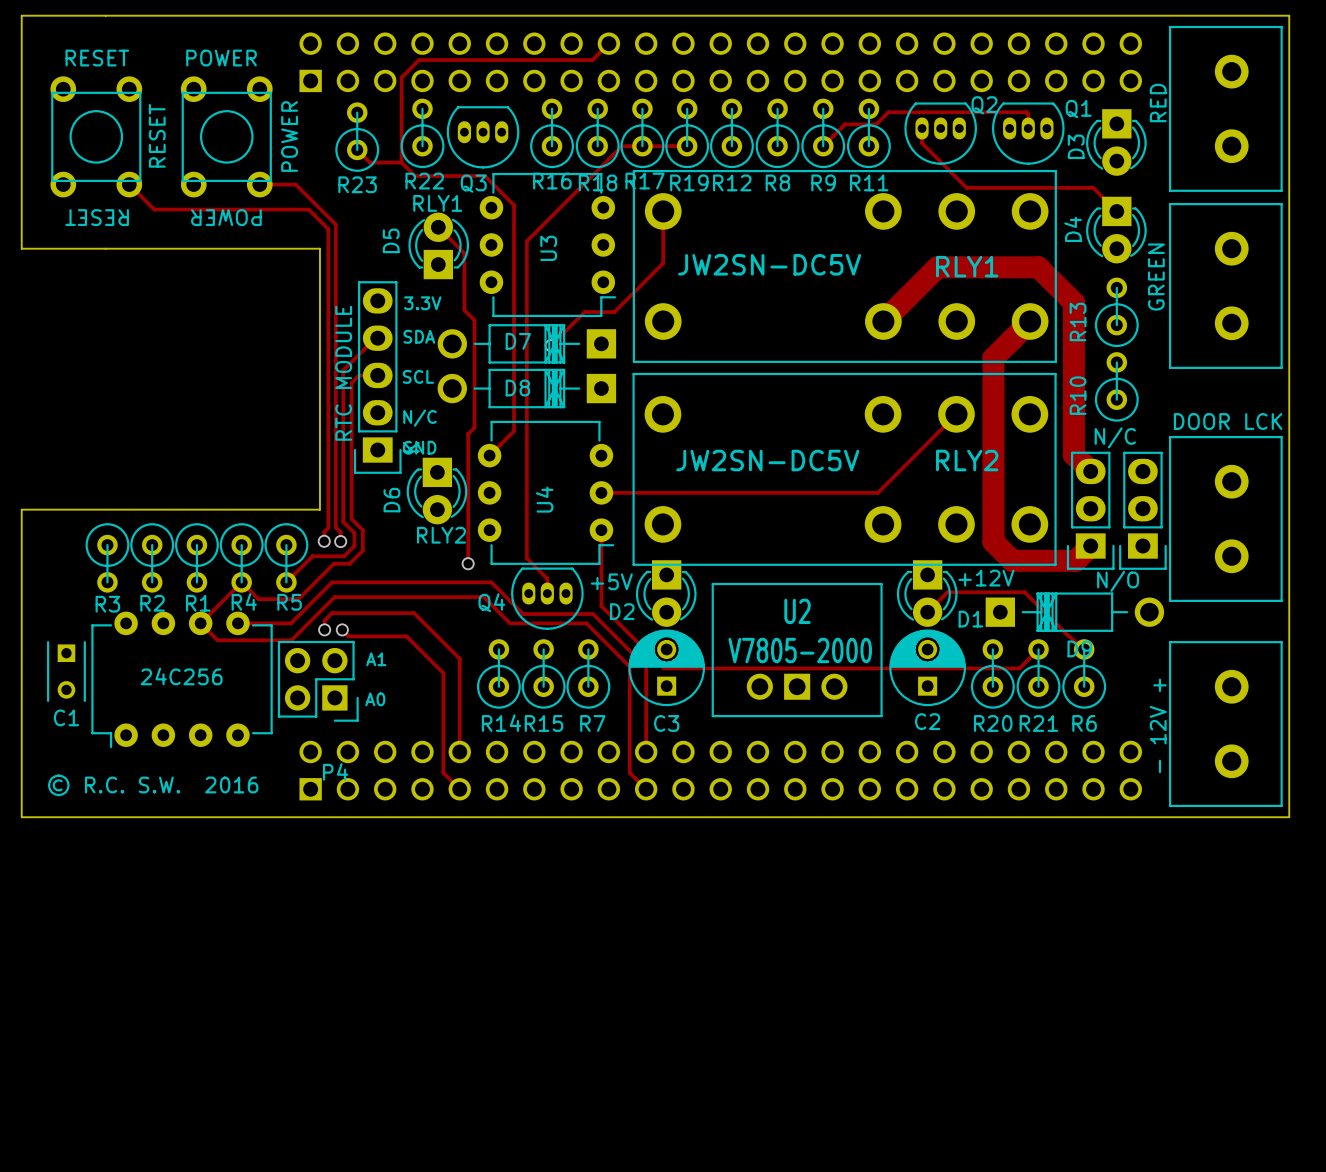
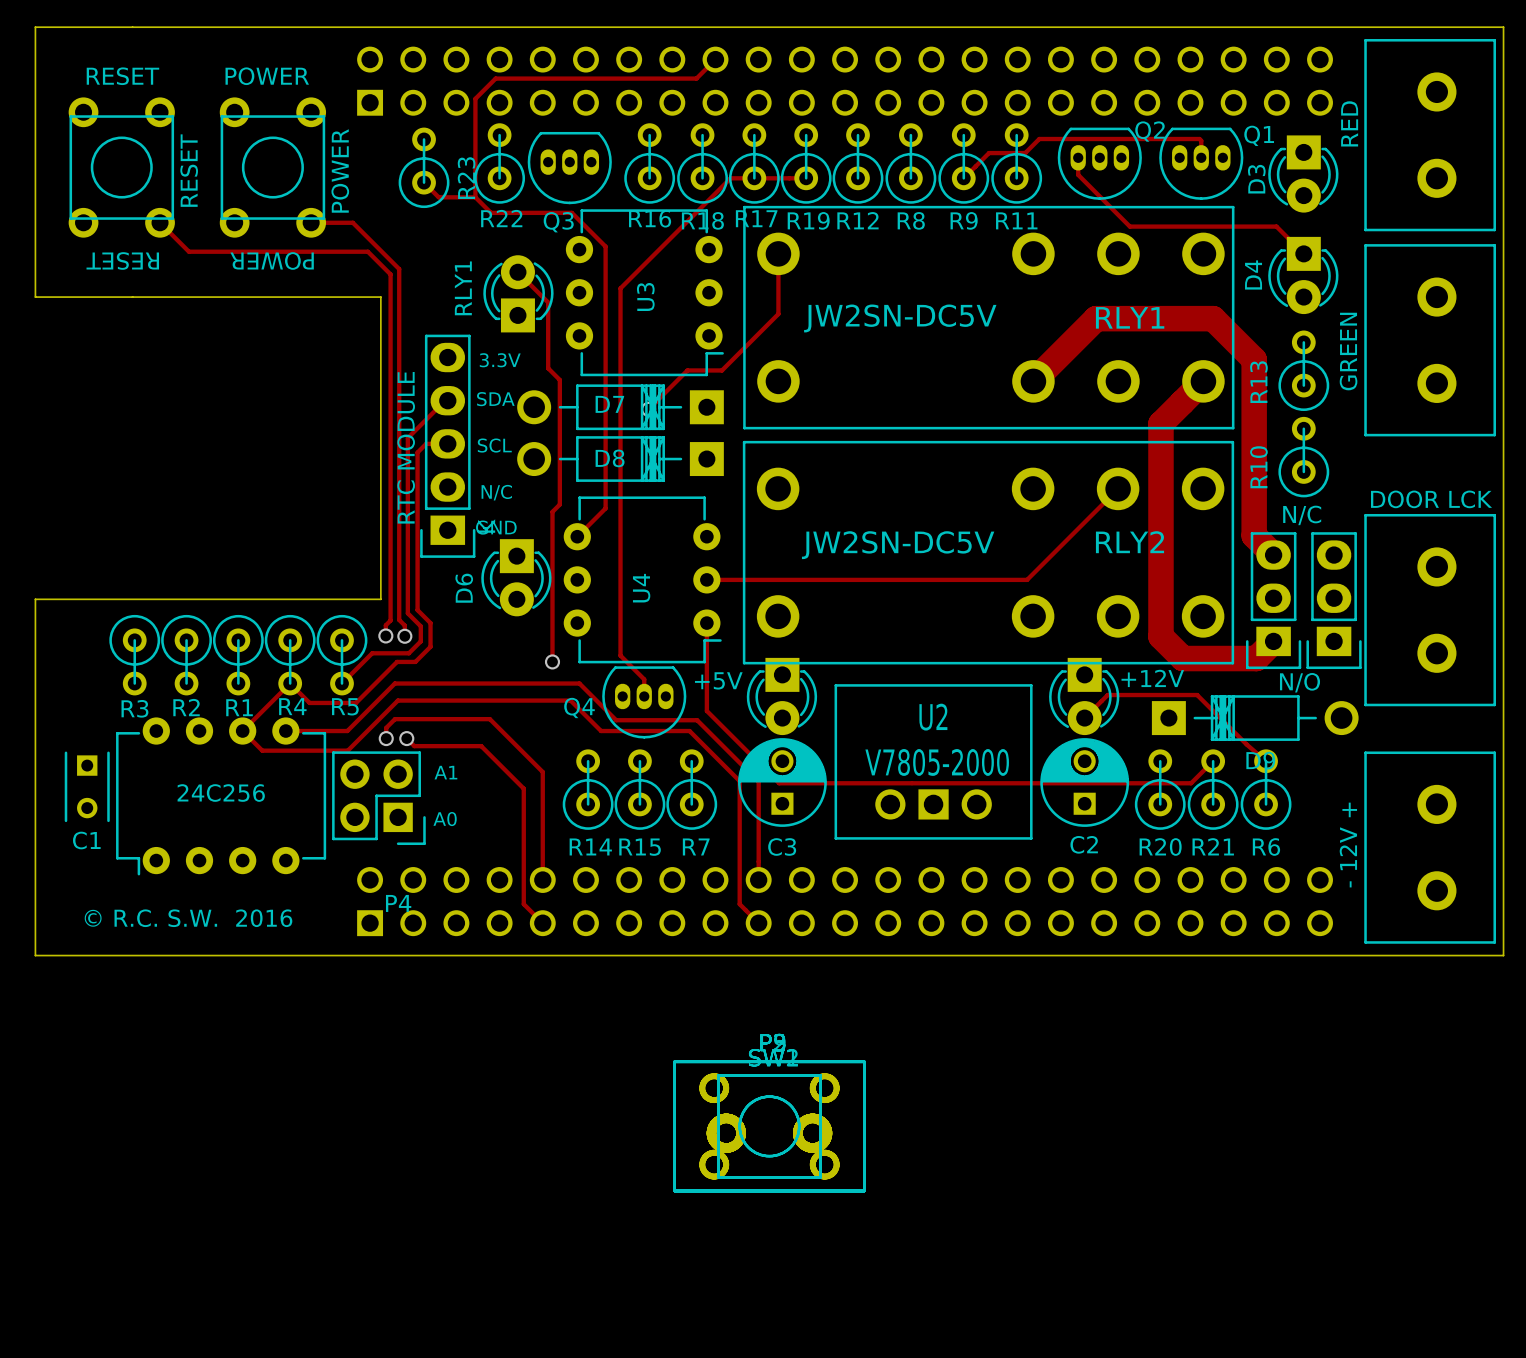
RED name: none -> RED (1349, 123)
text: RED (1158, 102) -> none
text: RESET (157, 135) -> none
text: POWER (289, 136) -> none
RESET name: none -> RESET (189, 170)
POWER name: none -> POWER (340, 170)
R23 name rotation: 0° (357, 184) -> 90° counterclockwise (466, 178)
R23 name position: R23 (357, 184) -> R23 (466, 178)
text: RLY1 (437, 203) -> none
D5 name: D5 (391, 240) -> RLY1 (463, 288)
text: GREEN (1156, 277) -> none
GREEN name: none -> GREEN (1348, 351)
RTC MODULE value: RTC MODULE (343, 373) -> none
RTC MODULE name: none -> RTC MODULE (406, 447)
text: DOOR LCK (1228, 421) -> none
DOOR LCK name: none -> DOOR LCK (1431, 499)
text: RLY2 (441, 535) -> none
text: +5V (611, 581) -> none
text: N/O (1118, 581) -> none
N/O name: none -> N/O (1300, 682)
D2 name: D2 (622, 611) -> +5V (718, 680)
D1 name: D1 (970, 619) -> +12V (1152, 678)
- 12V + name: none -> - 12V + (1348, 845)
text: - 12V + (1158, 725) -> none
part: none -> (769, 1126)
part: none -> (769, 1126)
part: none -> (769, 1126)
part: none -> (769, 1126)
part: none -> (769, 1126)
part: none -> (769, 1126)

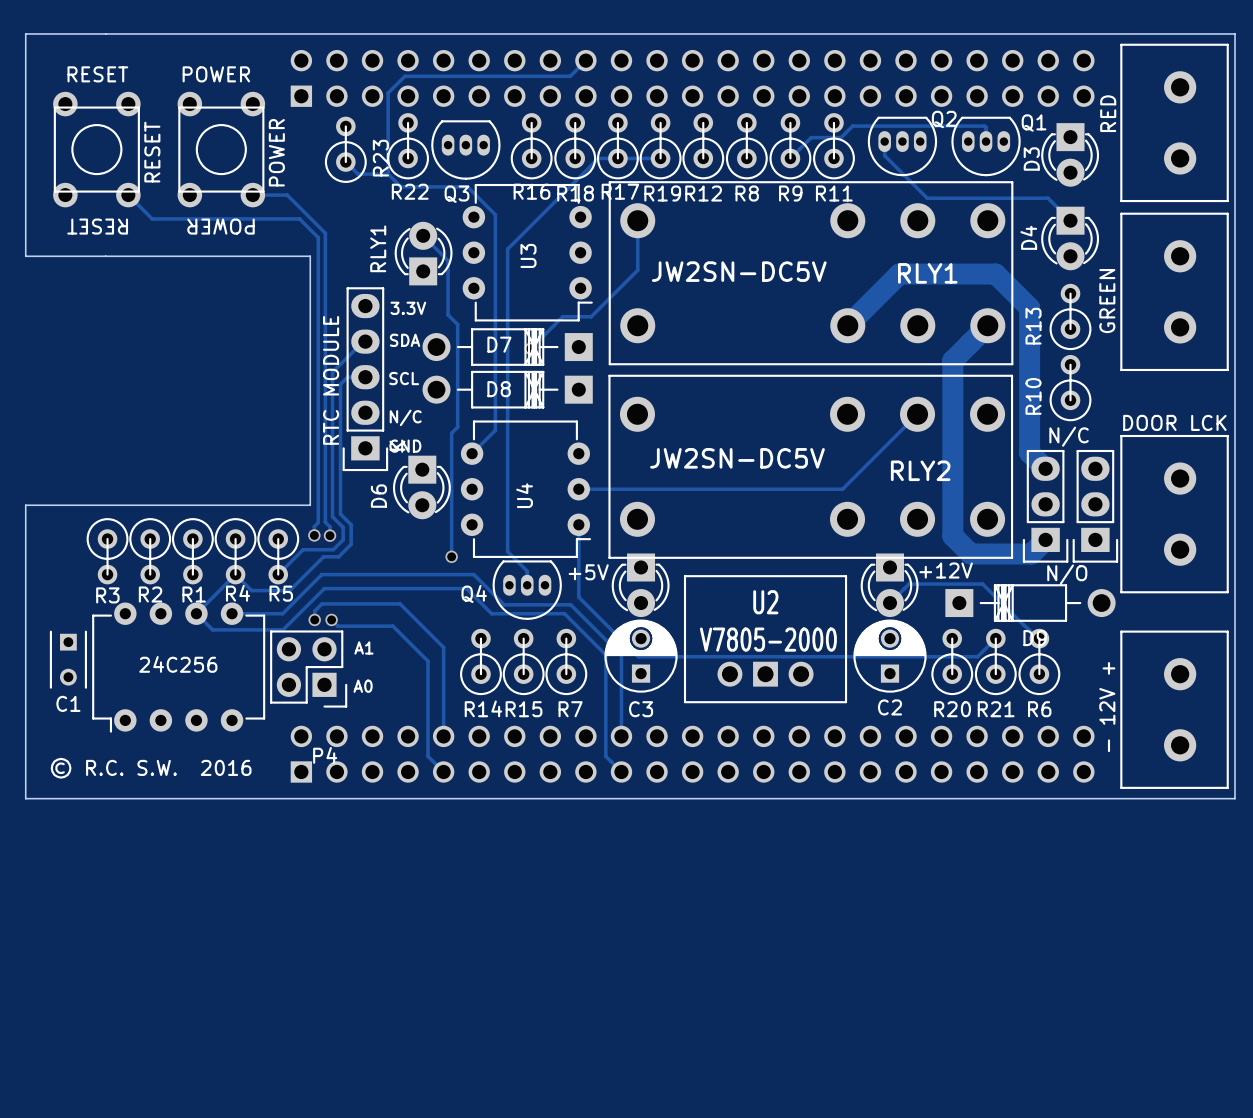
RLY2 name position: RLY2 (1130, 542) -> RLY2 (920, 470)
part: (769, 1126) -> none
part: (769, 1126) -> none
part: (769, 1126) -> none
part: (769, 1126) -> none
part: (769, 1126) -> none
part: (769, 1126) -> none

